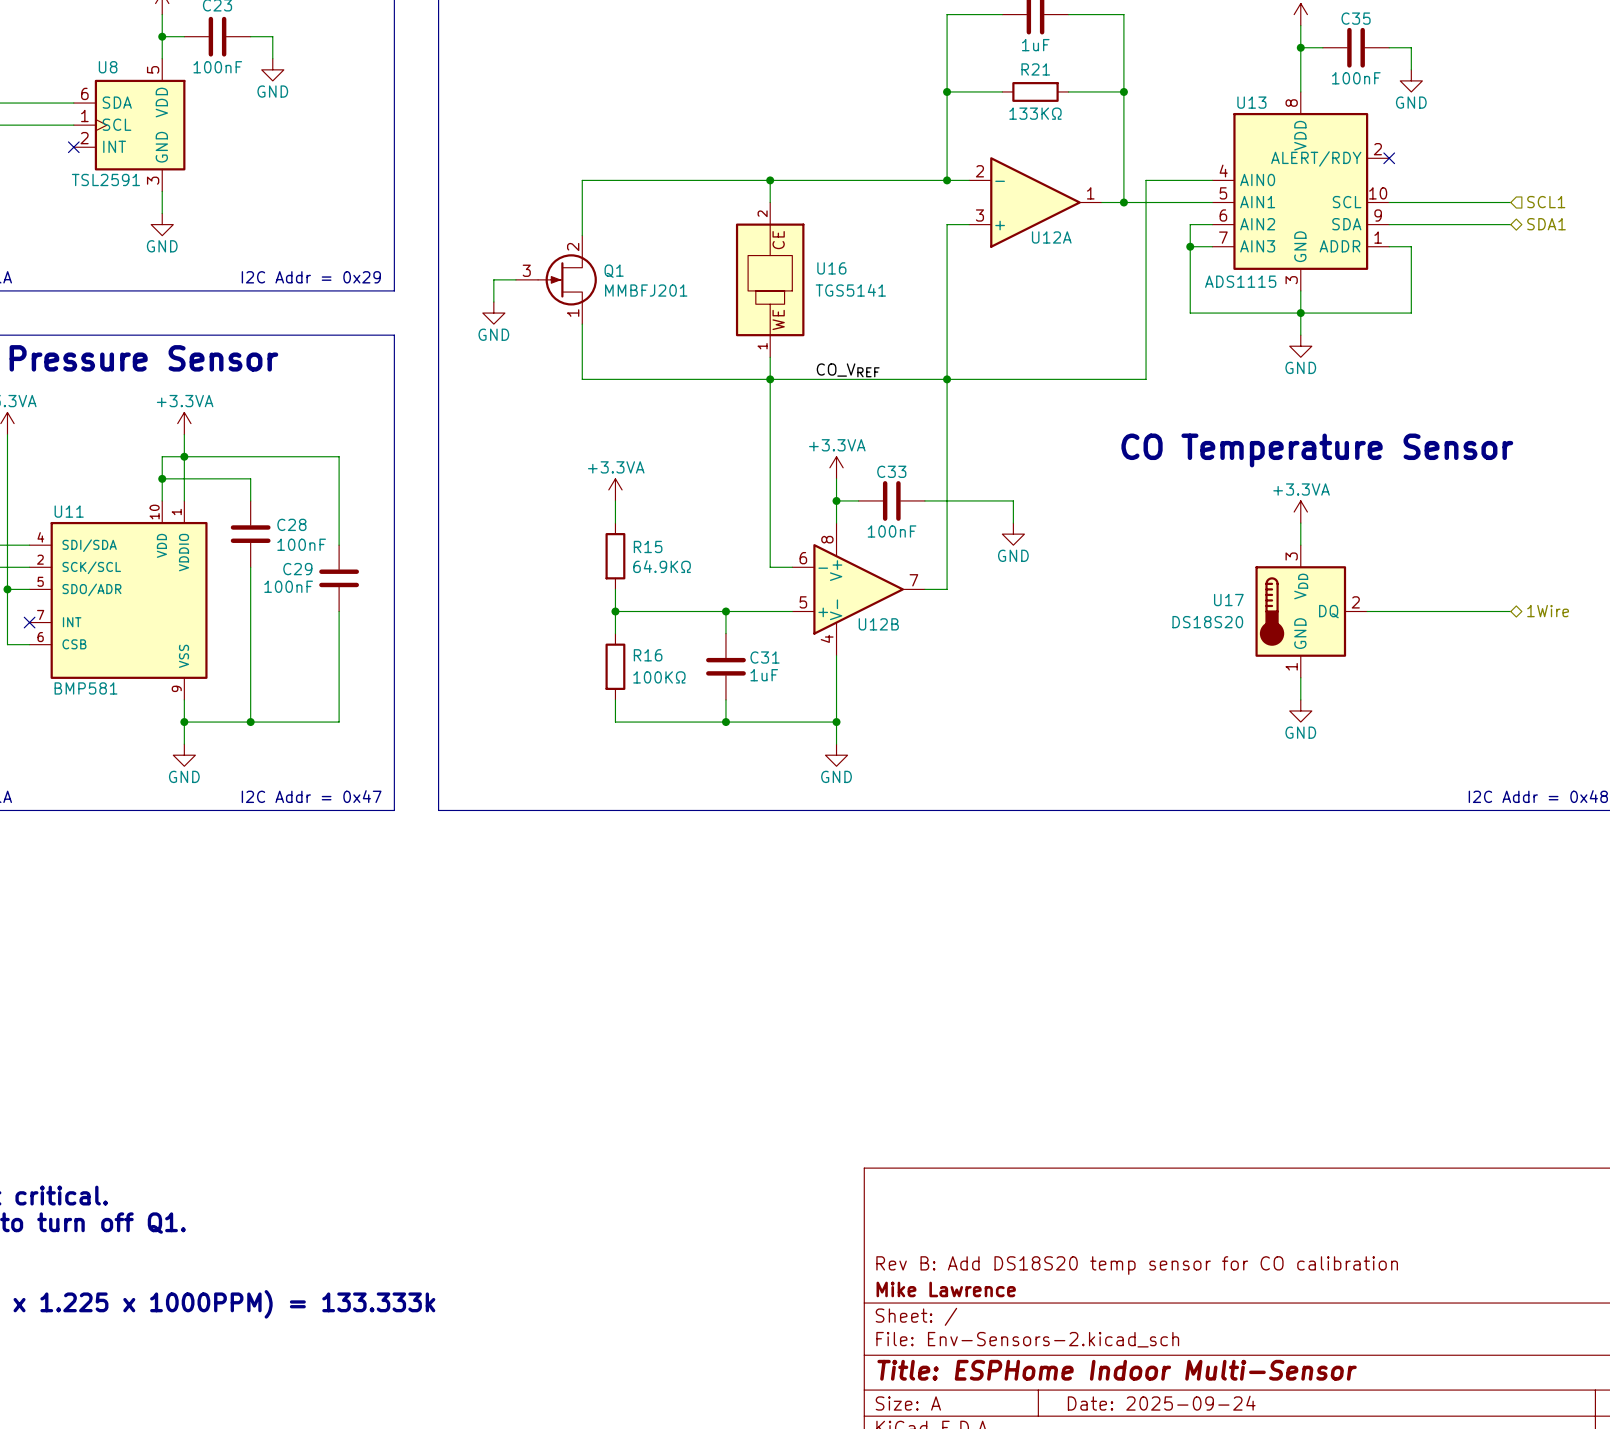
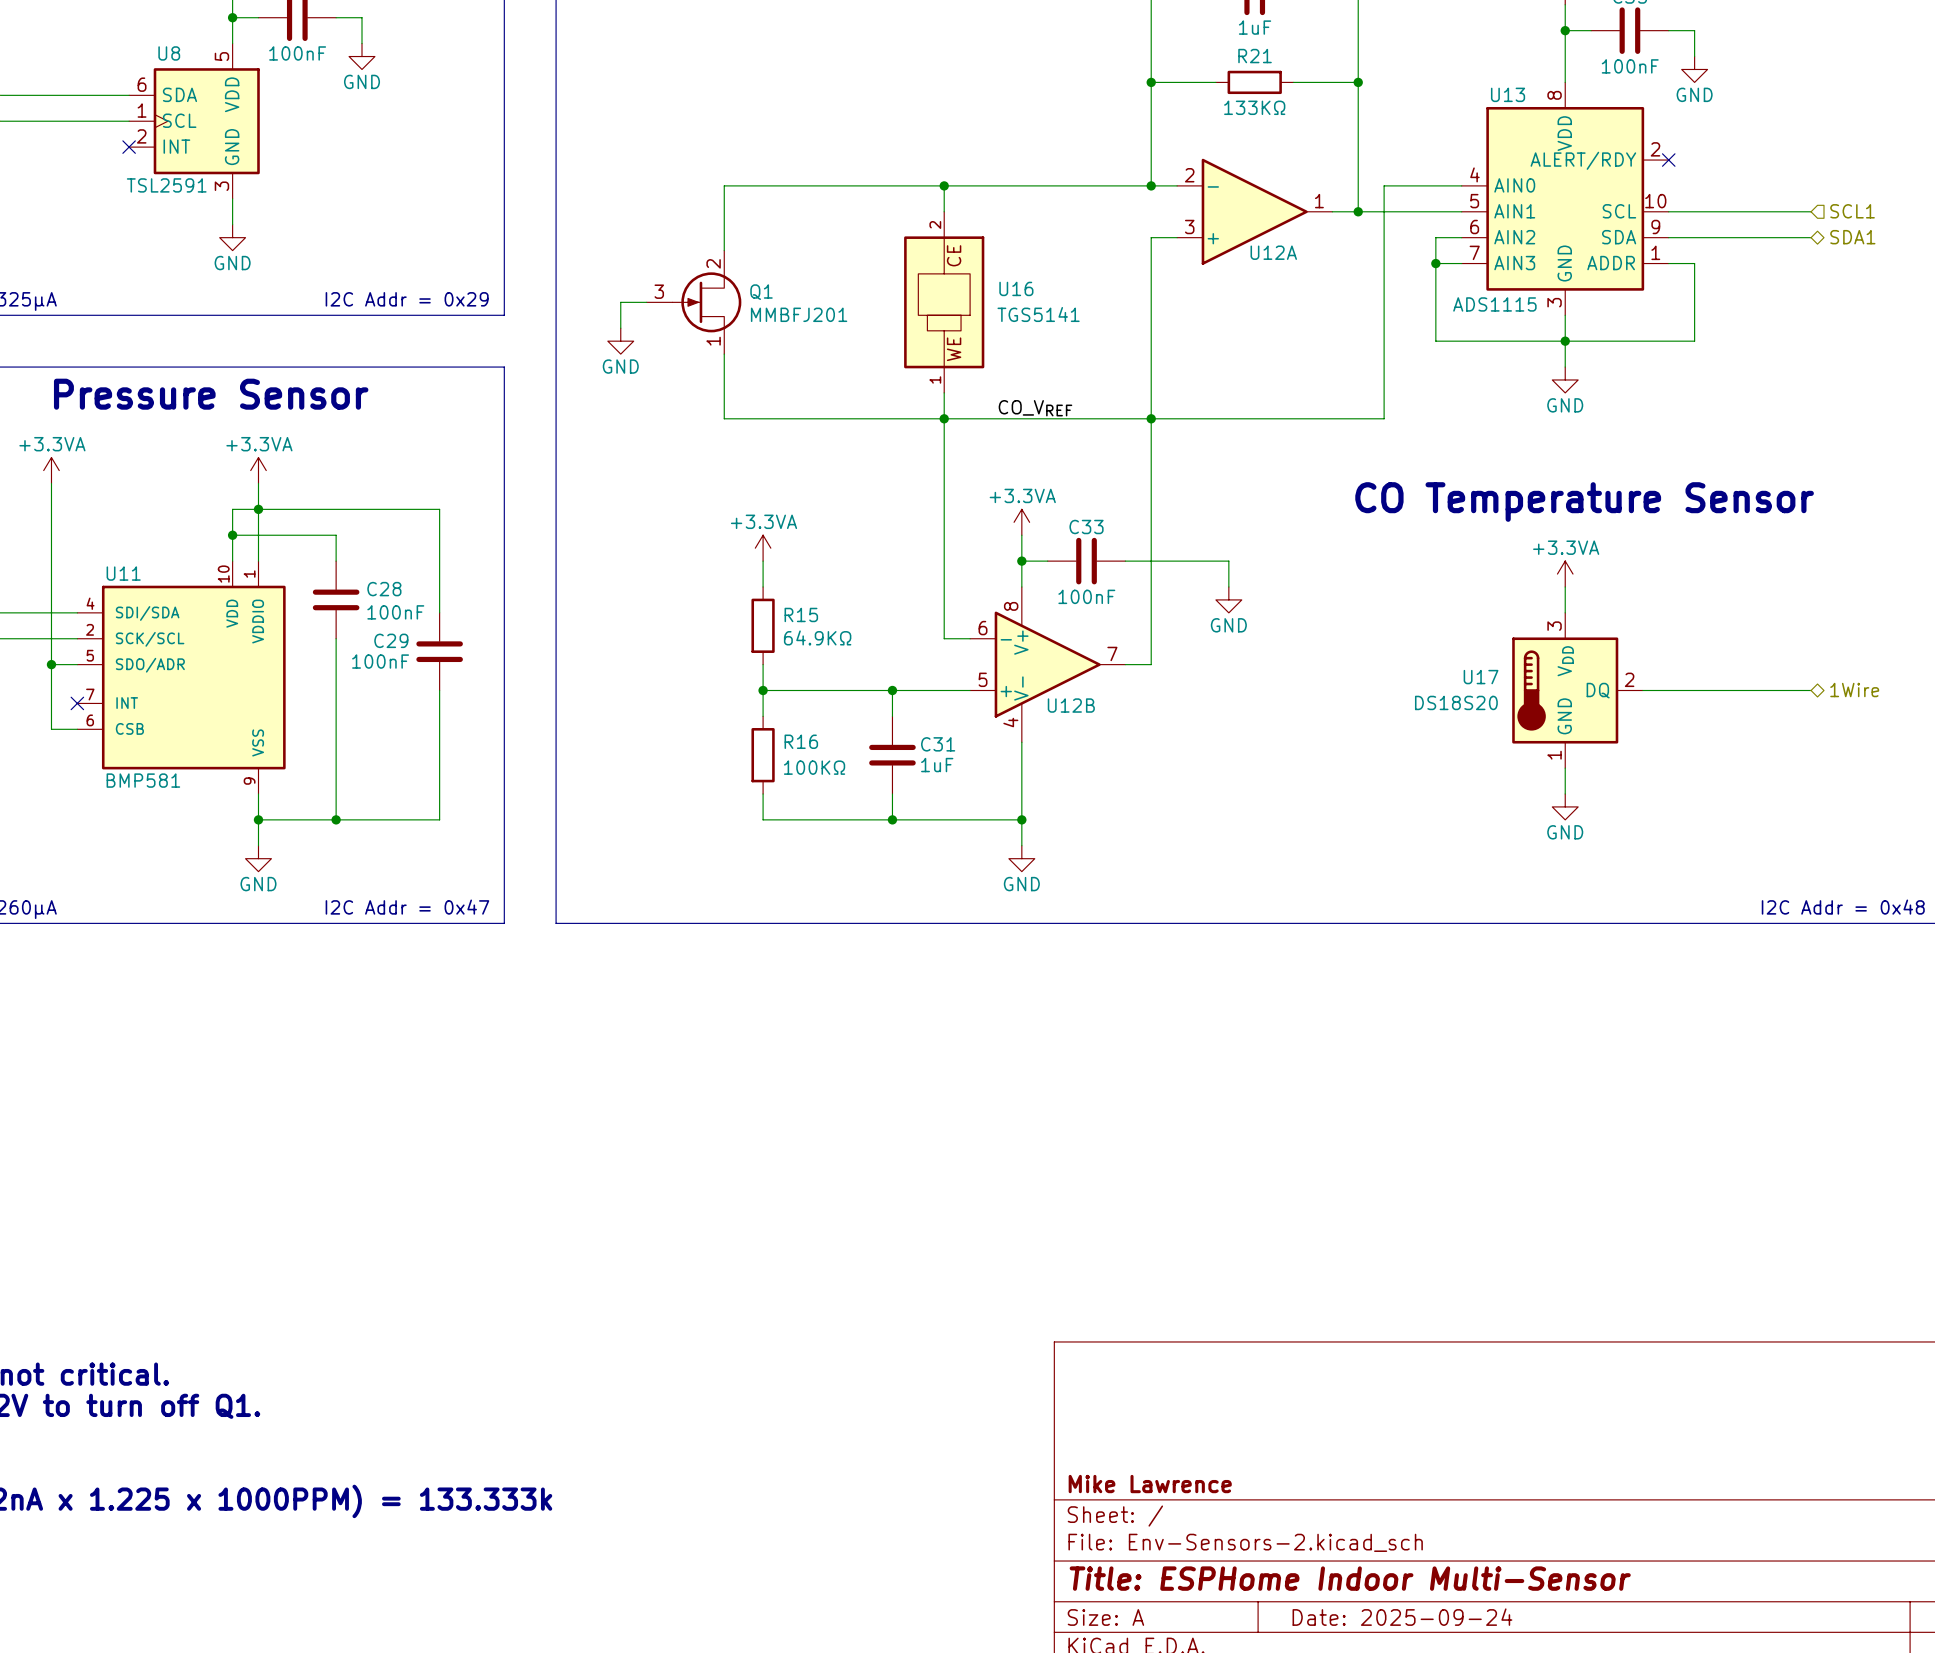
title block: Rev B: Add DS18S20 temp sensor for CO calibration (1137, 1265) -> none

